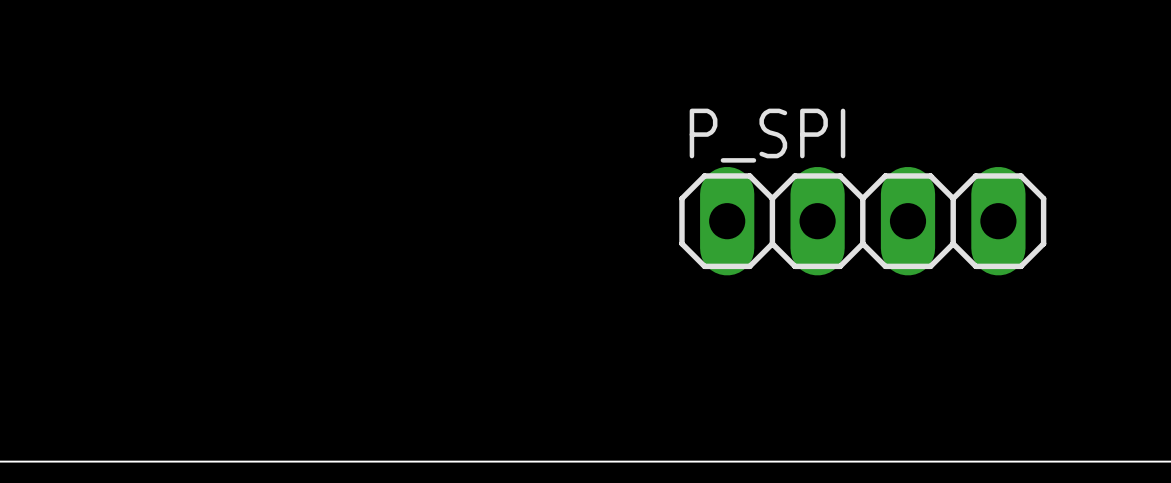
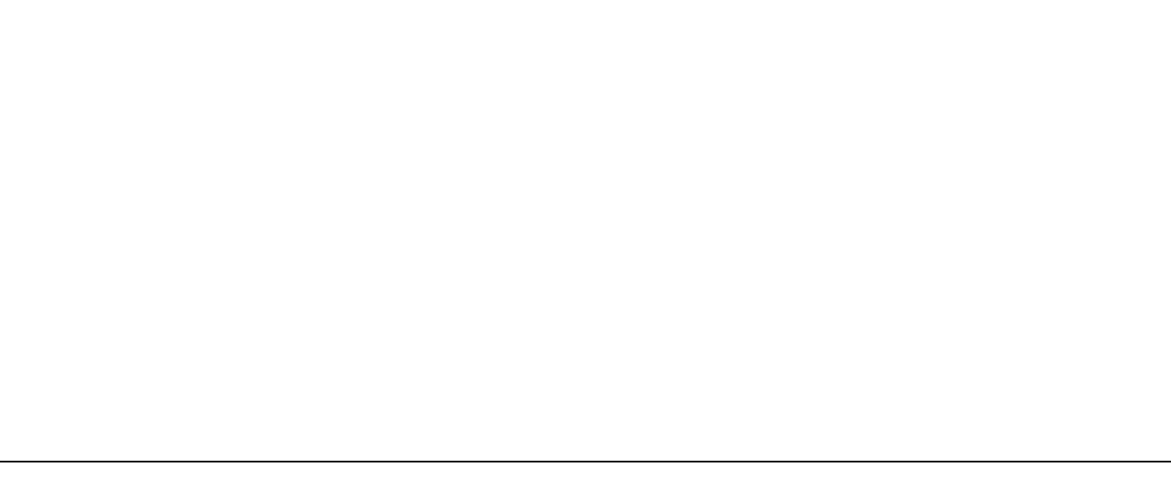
P_SPI: (862, 221) -> none

